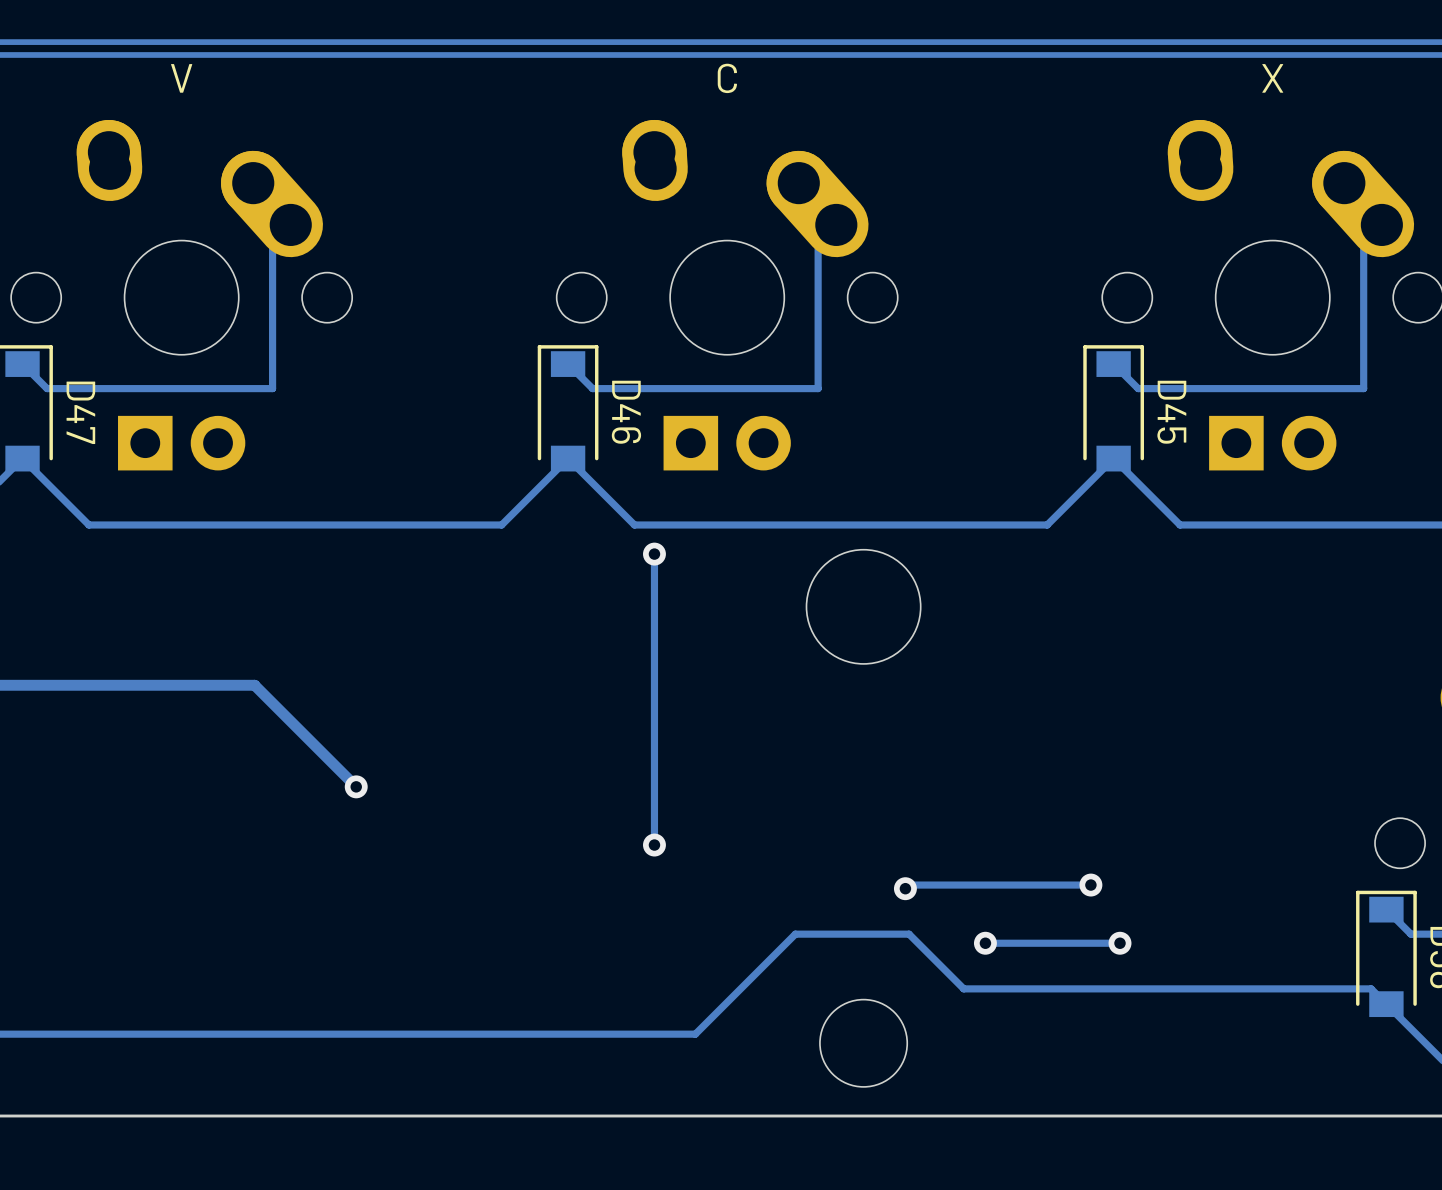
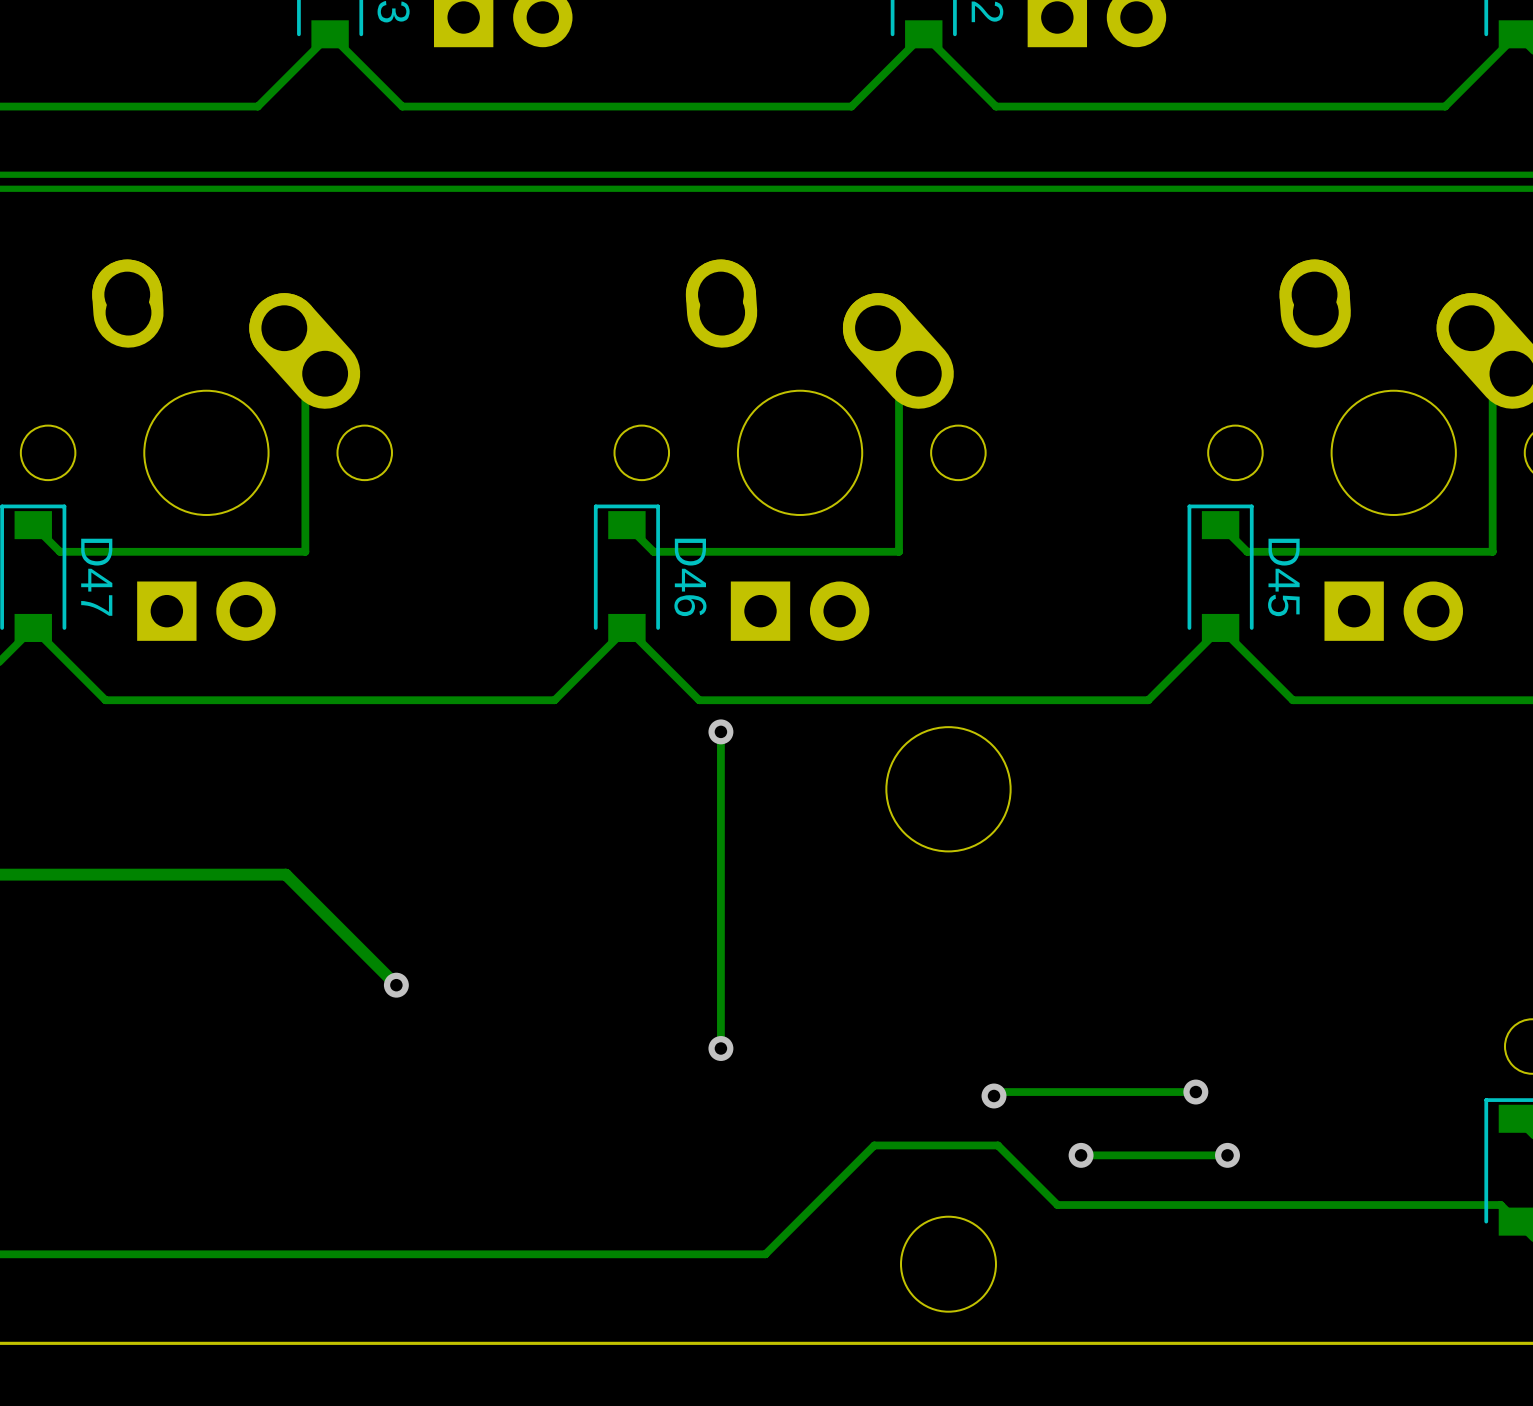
part value: V (181, 78) -> none
part value: C (727, 78) -> none
part value: X (1272, 78) -> none

